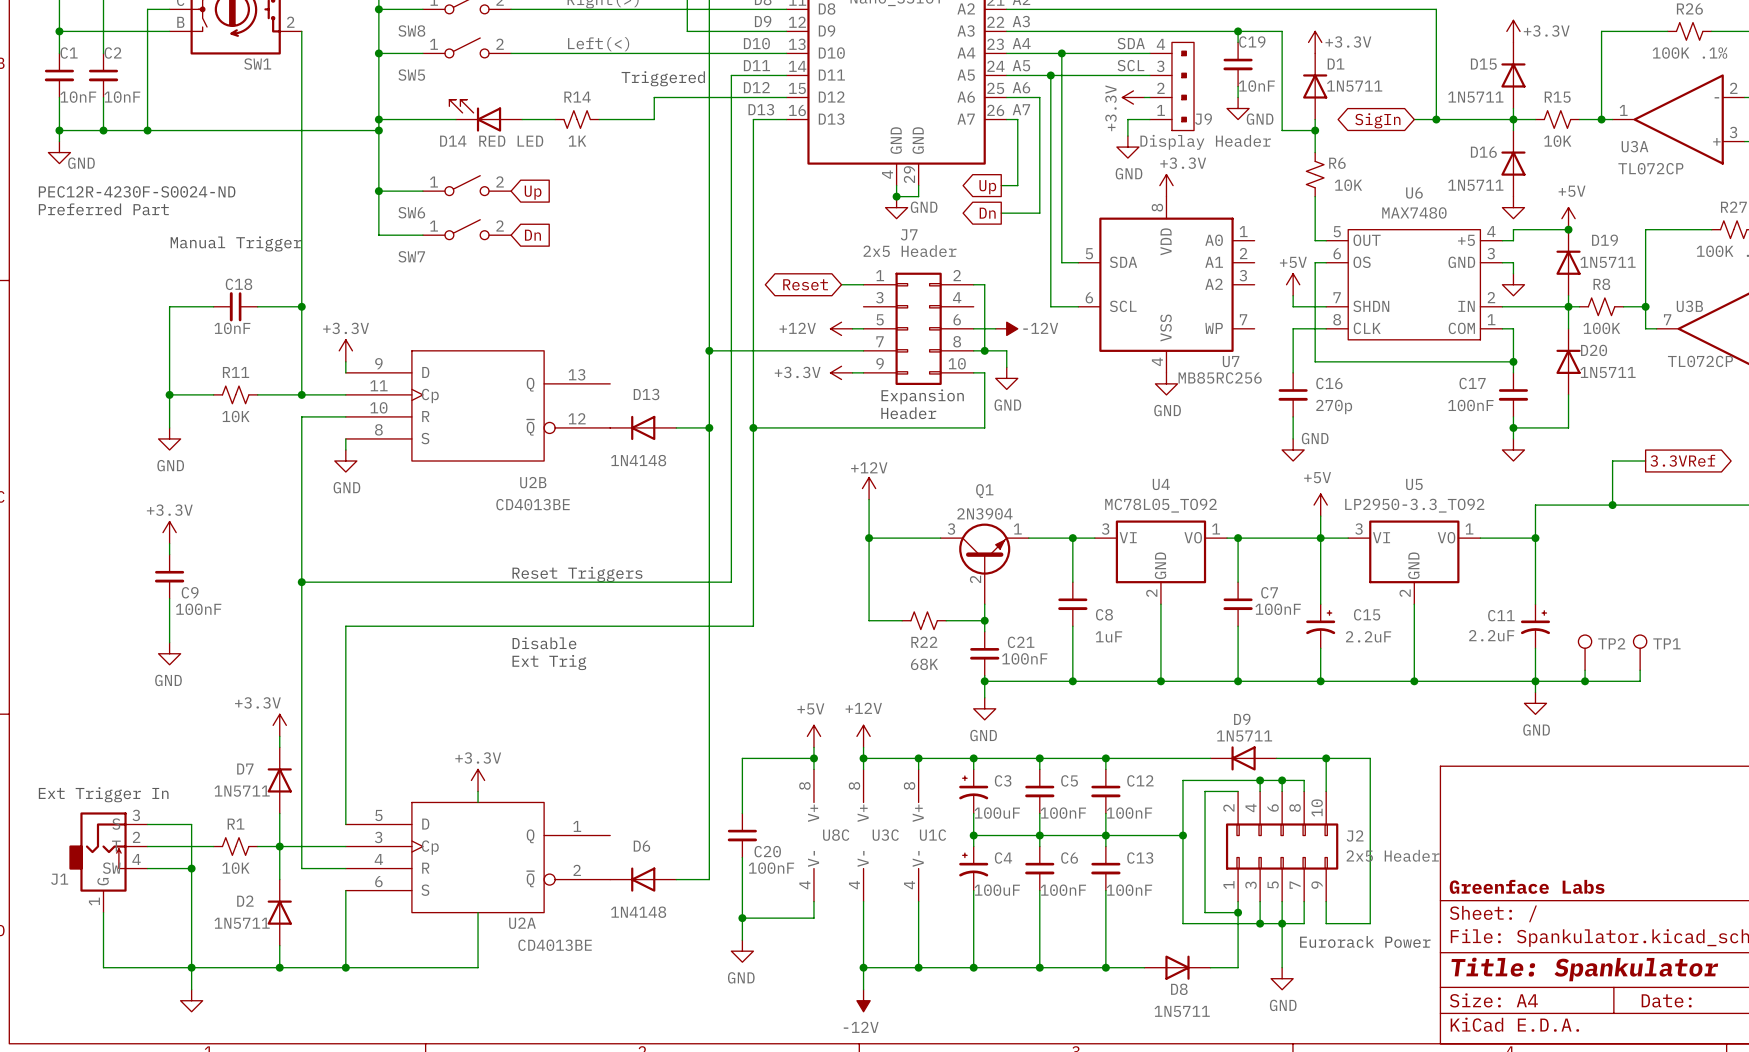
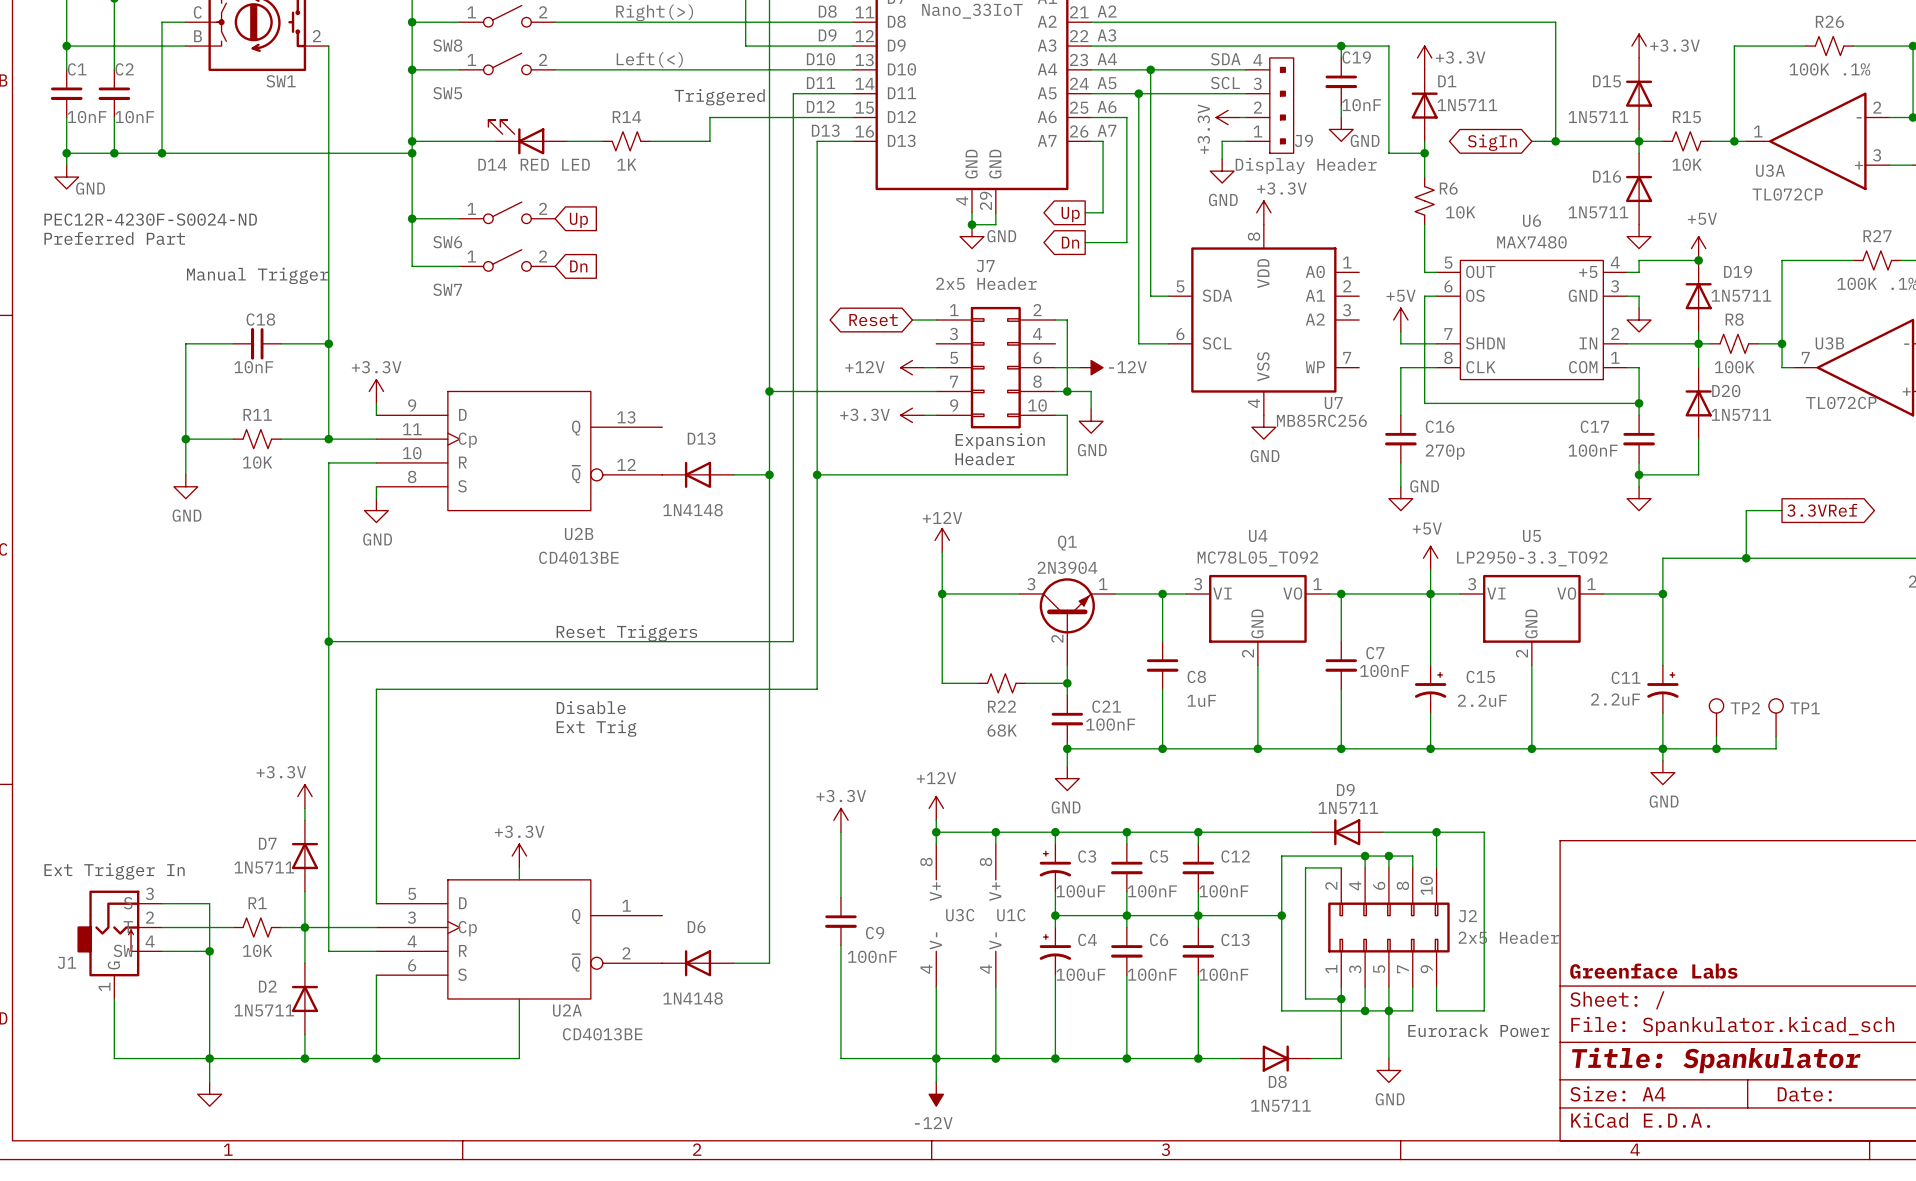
power symbol: +3.3V (169, 532) -> none
wire: (169, 543) (169, 554) -> none
C9 position: (169, 576) -> (840, 921)
C9 name position: C9 (190, 592) -> C9 (875, 933)
wire: (169, 598) (169, 642) -> none
power symbol: GND (169, 653) -> none
power symbol: +5V (813, 736) -> none
power symbol: none -> +3.3V (840, 820)
wire: (813, 747) (813, 769) -> none
wire: none -> (840, 832) (840, 897)
wire: (813, 758) (742, 758) (742, 813) -> none
junction: (813, 758) -> none
C20: 100nF (742, 835) -> none
U8C: (813, 835) -> none
wire: (742, 857) (742, 940) -> none
wire: none -> (840, 945) (840, 1058) (936, 1058)
wire: (813, 901) (813, 918) (742, 918) -> none
junction: (742, 918) -> none
power symbol: GND (742, 951) -> none

